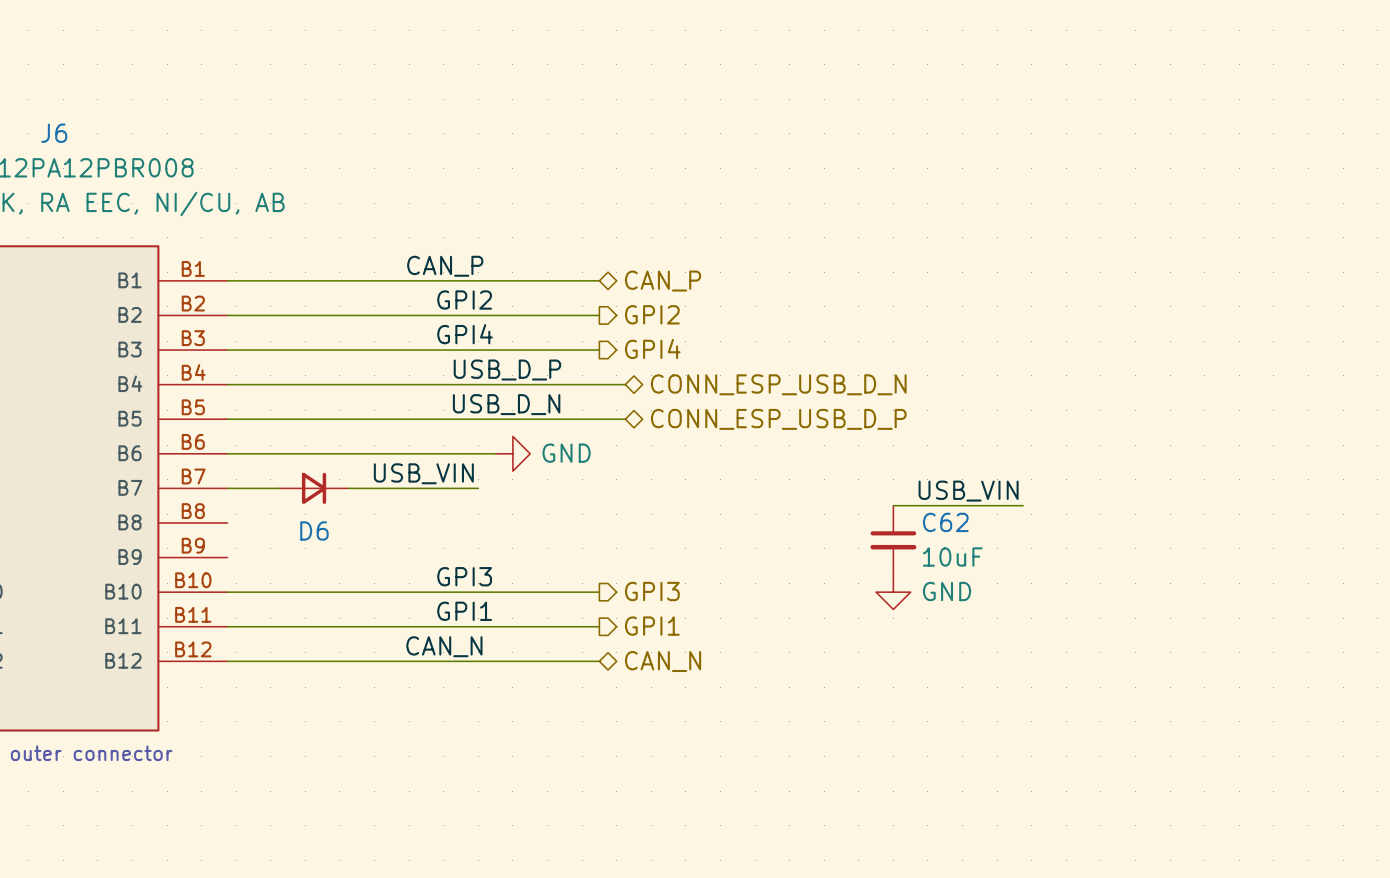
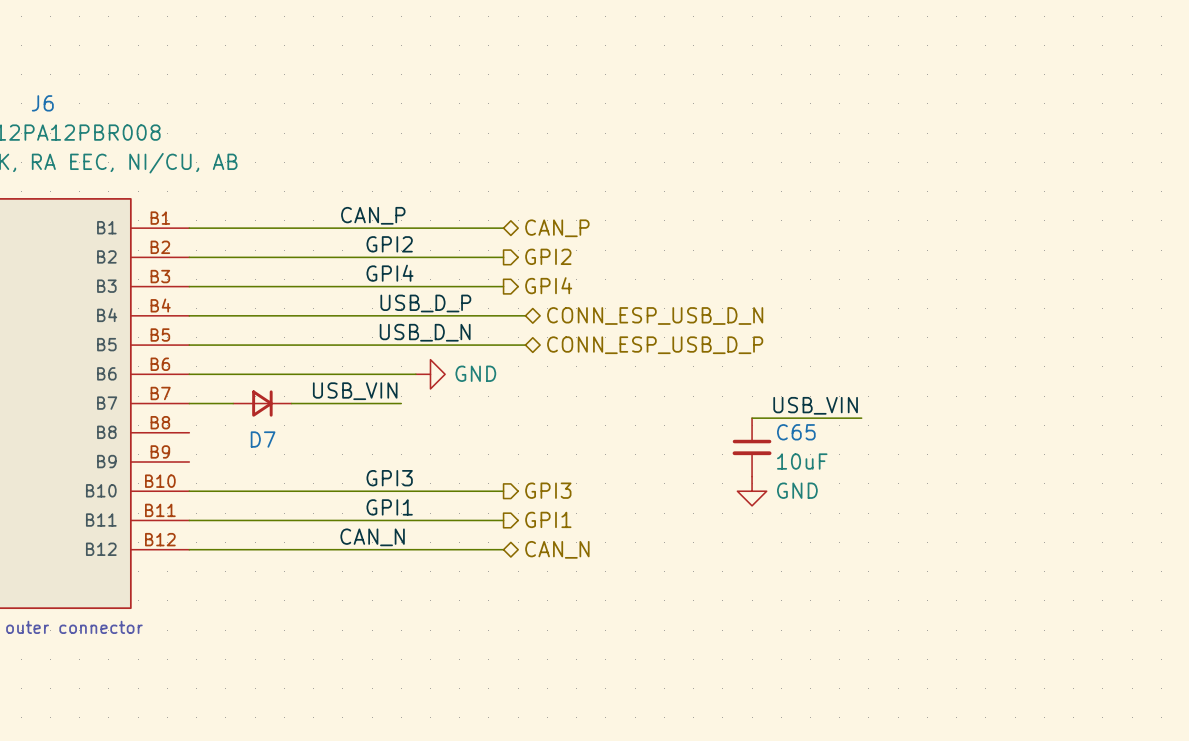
C62 name: C62 (945, 522) -> C65 (796, 432)
D6 name: D6 (314, 530) -> D7 (263, 439)

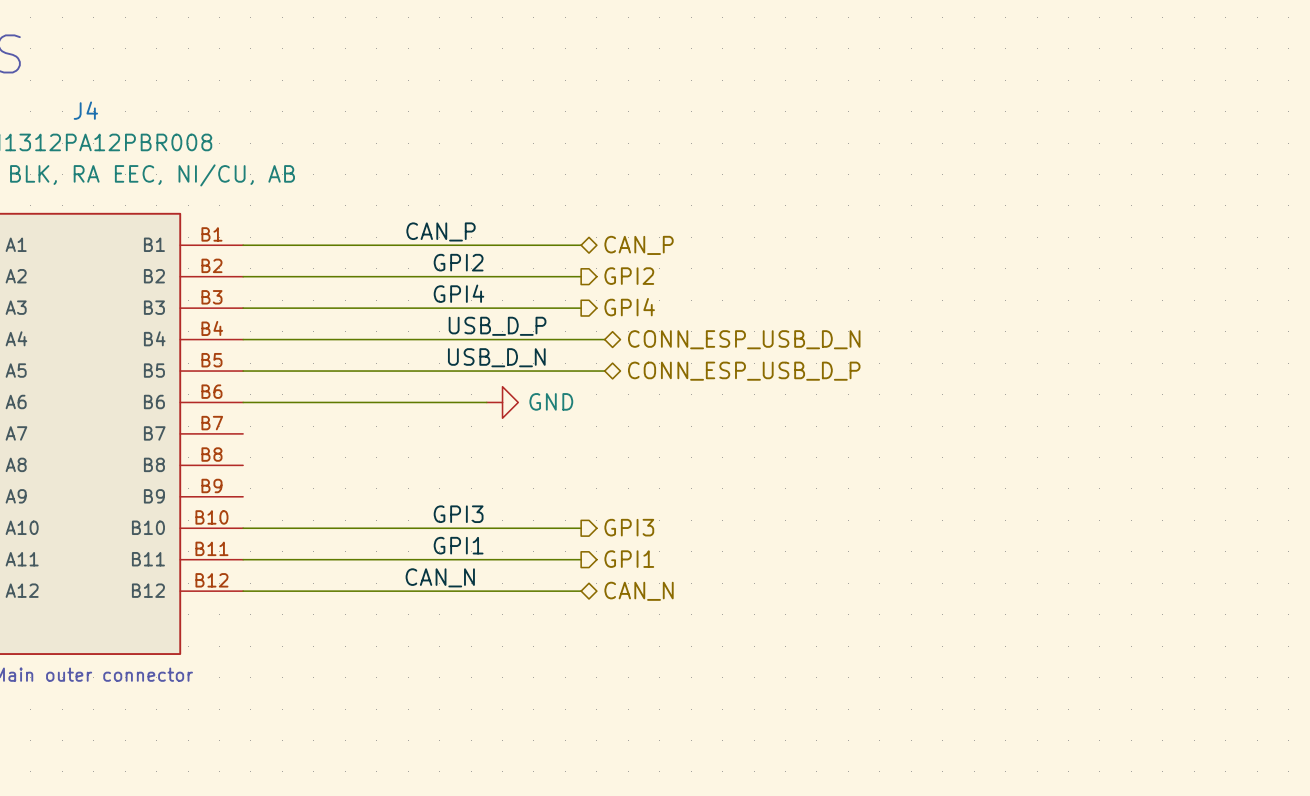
J6 name: J6 (42, 103) -> J4 (85, 110)
label: USB_VIN (355, 391) -> none
wire: (189, 403) (233, 403) -> none
D7: (262, 403) -> none
wire: (291, 403) (401, 403) -> none
label: USB_VIN (815, 405) -> none
wire: (752, 418) (861, 418) -> none
C65: 10uF (752, 447) -> none
power symbol: GND (752, 491) -> none

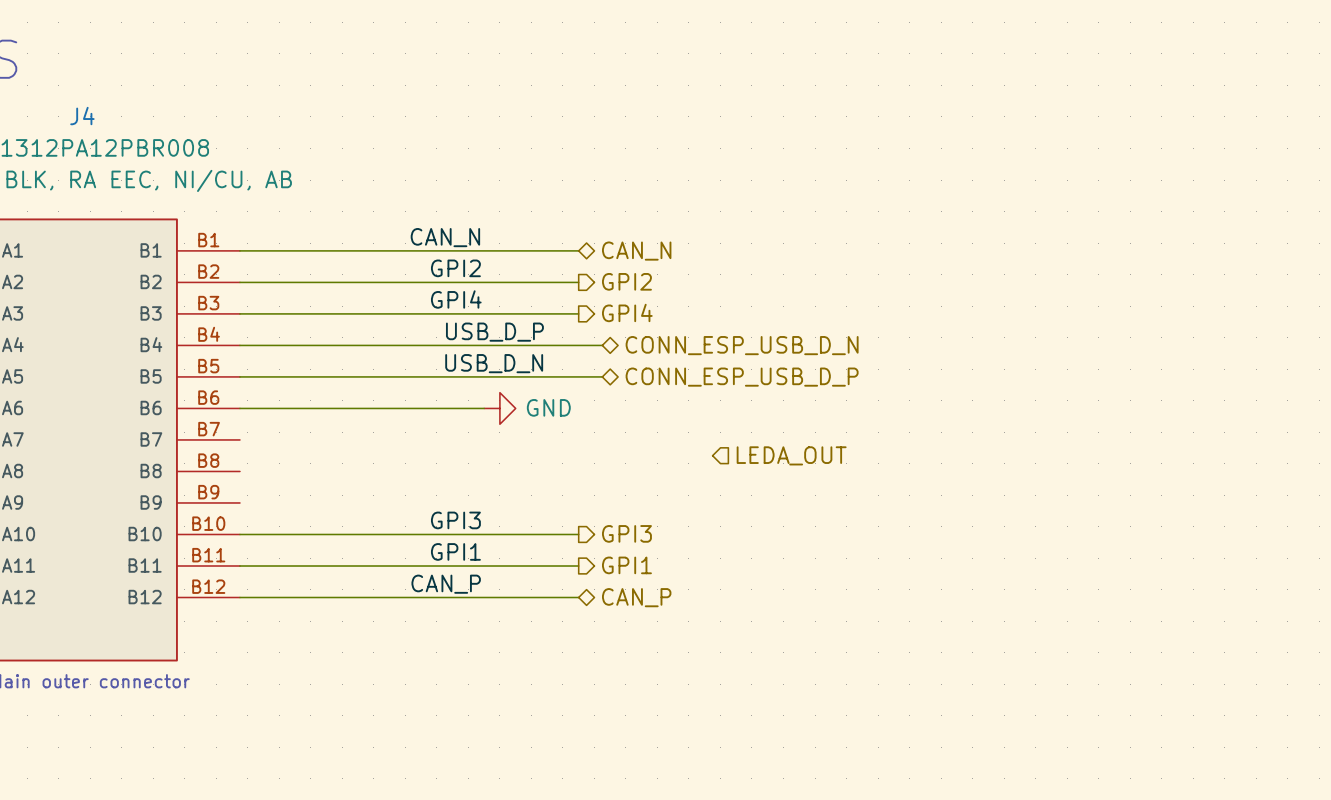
label: CAN_P (441, 231) -> CAN_N (445, 237)
hierarchical label: CAN_P (639, 245) -> CAN_N (636, 251)
hierarchical label: none -> LEDA_OUT (791, 455)
label: CAN_N (440, 577) -> CAN_P (446, 584)
hierarchical label: CAN_N (639, 591) -> CAN_P (636, 597)

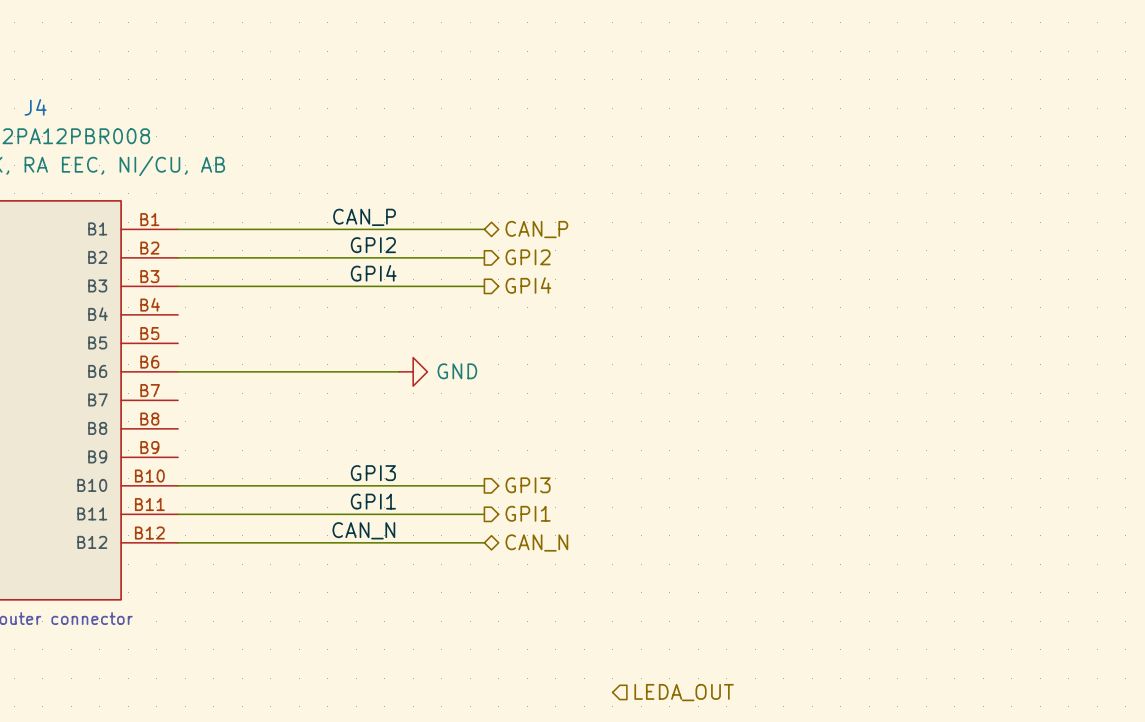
label: CAN_N (445, 237) -> CAN_P (364, 217)
hierarchical label: CAN_N (636, 251) -> CAN_P (536, 229)
label: USB_D_P (494, 332) -> none
wire: (239, 345) (602, 345) -> none
hierarchical label: CONN_ESP_USB_D_N (742, 345) -> none
label: USB_D_N (494, 363) -> none
wire: (239, 376) (602, 376) -> none
hierarchical label: CONN_ESP_USB_D_P (742, 377) -> none
hierarchical label position: LEDA_OUT (791, 455) -> LEDA_OUT (684, 692)
label: CAN_P (446, 584) -> CAN_N (363, 530)
hierarchical label: CAN_P (636, 597) -> CAN_N (536, 542)

